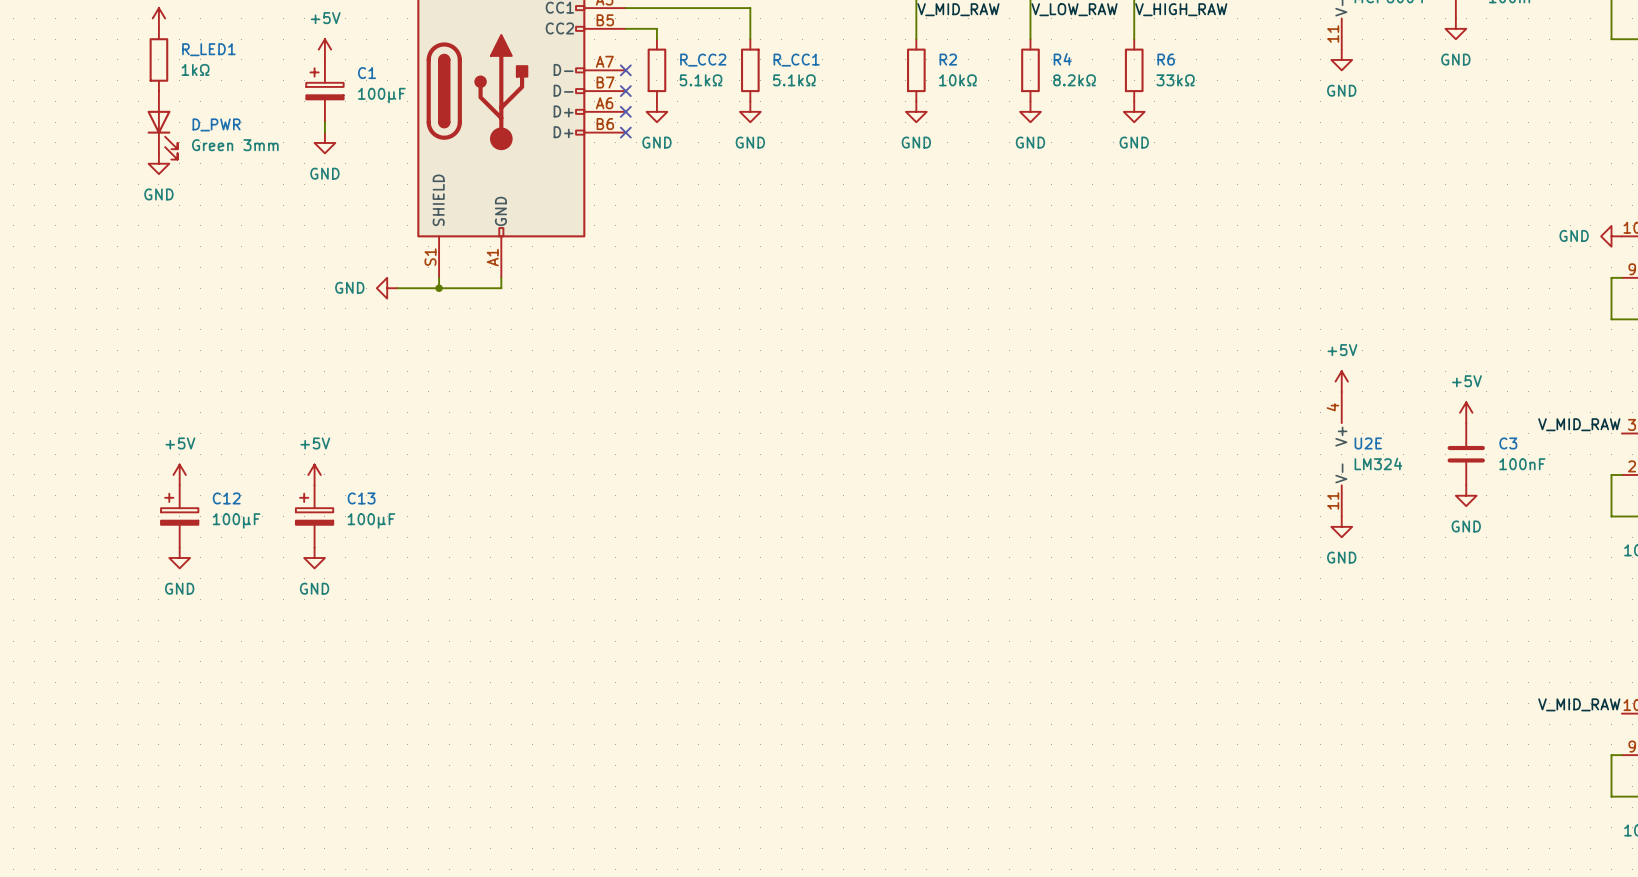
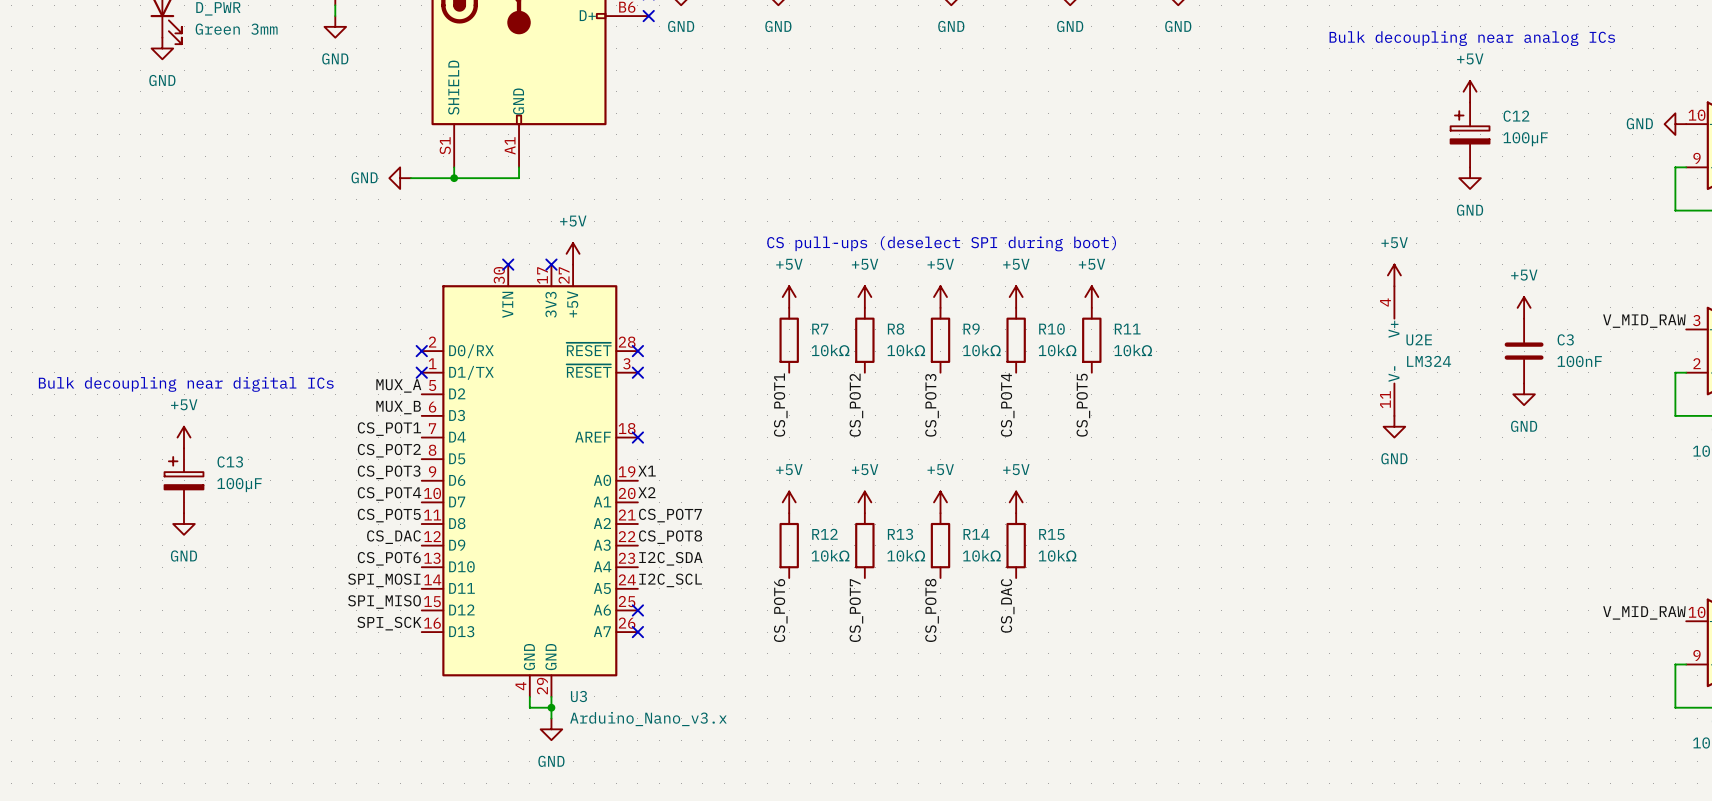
text: none -> Bulk decoupling near analog ICs (1472, 38)
power symbol: none -> +5V (1470, 91)
power symbol: none -> GND (1470, 178)
text: none -> CS pull-ups (deselect SPI during boot) (941, 243)
power symbol: none -> +5V (573, 253)
no-connect mark: none -> (508, 264)
no-connect mark: none -> (551, 264)
power symbol: none -> +5V (789, 297)
power symbol: none -> +5V (864, 297)
power symbol: none -> +5V (940, 297)
power symbol: none -> +5V (1016, 297)
power symbol: none -> +5V (1091, 297)
R7: none -> 10kΩ (789, 340)
R8: none -> 10kΩ (864, 340)
R9: none -> 10kΩ (940, 340)
R10: none -> 10kΩ (1016, 340)
R11: none -> 10kΩ (1091, 340)
no-connect mark: none -> (421, 351)
no-connect mark: none -> (637, 351)
power symbol position: +5V (179, 474) -> +5V (184, 437)
power symbol: +5V (314, 474) -> none
no-connect mark: none -> (421, 372)
no-connect mark: none -> (637, 372)
text: none -> Bulk decoupling near digital ICs (186, 384)
label: none -> MUX_A (398, 385)
label: none -> MUX_B (398, 407)
label: none -> CS_POT1 (780, 405)
label: none -> CS_POT2 (856, 405)
label: none -> CS_POT3 (932, 405)
label: none -> CS_POT4 (1007, 404)
label: none -> CS_POT5 (1083, 405)
C12 position: (179, 516) -> (1470, 134)
C13 position: (314, 516) -> (184, 480)
label: none -> CS_POT1 (389, 429)
no-connect mark: none -> (637, 437)
label: none -> CS_POT2 (389, 450)
power symbol position: GND (179, 557) -> GND (184, 524)
power symbol: GND (314, 557) -> none
label: none -> CS_POT3 (389, 472)
label: none -> X1 (647, 471)
U3: none -> Arduino_Nano_v3.x (529, 480)
label: none -> CS_POT4 (389, 493)
label: none -> X2 (646, 492)
power symbol: none -> +5V (789, 502)
power symbol: none -> +5V (864, 502)
power symbol: none -> +5V (940, 502)
power symbol: none -> +5V (1016, 502)
label: none -> CS_POT5 (389, 515)
label: none -> CS_POT7 (670, 515)
label: none -> CS_DAC (393, 537)
label: none -> CS_POT8 (670, 537)
R12: none -> 10kΩ (789, 545)
R13: none -> 10kΩ (864, 545)
R14: none -> 10kΩ (940, 545)
R15: none -> 10kΩ (1016, 545)
label: none -> CS_POT6 (389, 558)
label: none -> I2C_SDA (670, 558)
label: none -> SPI_MOSI (384, 580)
label: none -> I2C_SCL (670, 580)
label: none -> SPI_MISO (384, 602)
label: none -> CS_DAC (1007, 605)
no-connect mark: none -> (637, 610)
label: none -> CS_POT6 (780, 610)
label: none -> CS_POT7 (856, 610)
label: none -> CS_POT8 (932, 610)
label: none -> SPI_SCK (389, 623)
no-connect mark: none -> (637, 632)
wire: none -> (529, 696) (529, 707) (551, 707)
wire: none -> (551, 696) (551, 718)
junction: none -> (551, 707)
power symbol: none -> GND (551, 729)

